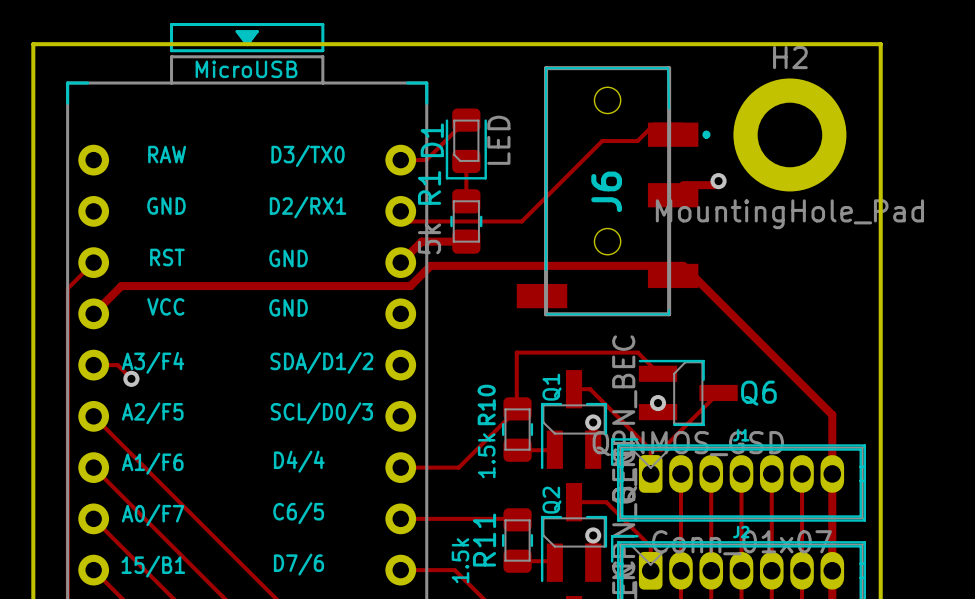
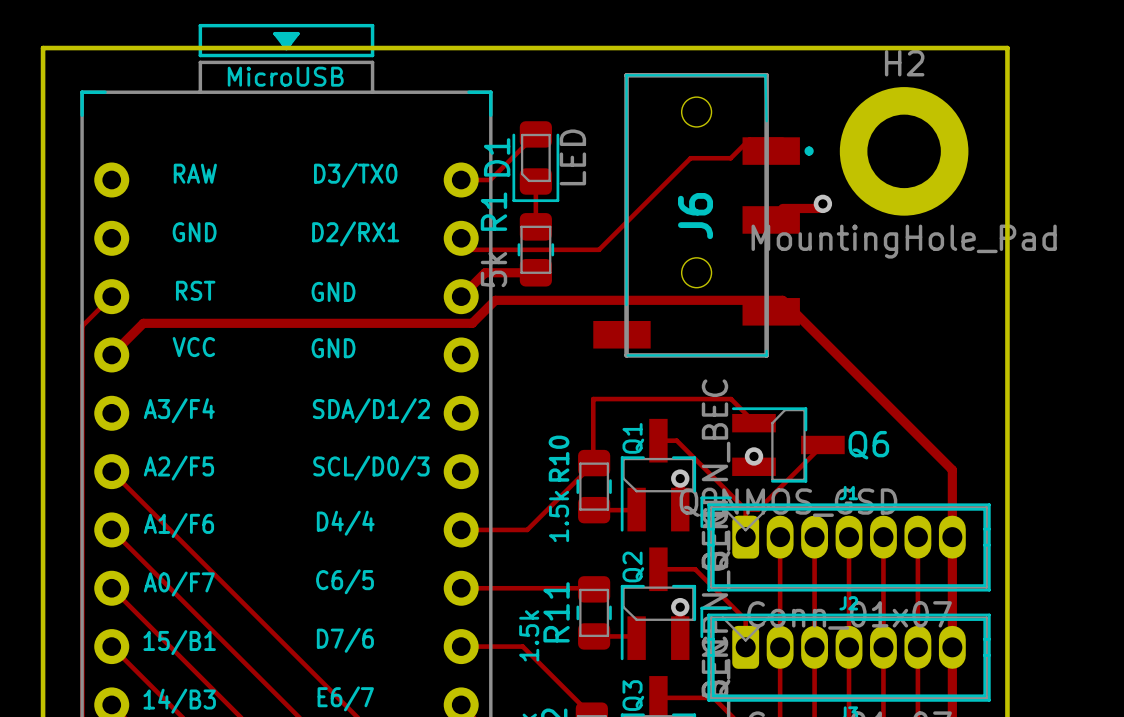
track: (93, 365) (117, 365) (131, 378) -> none
via: (131, 378) -> none

